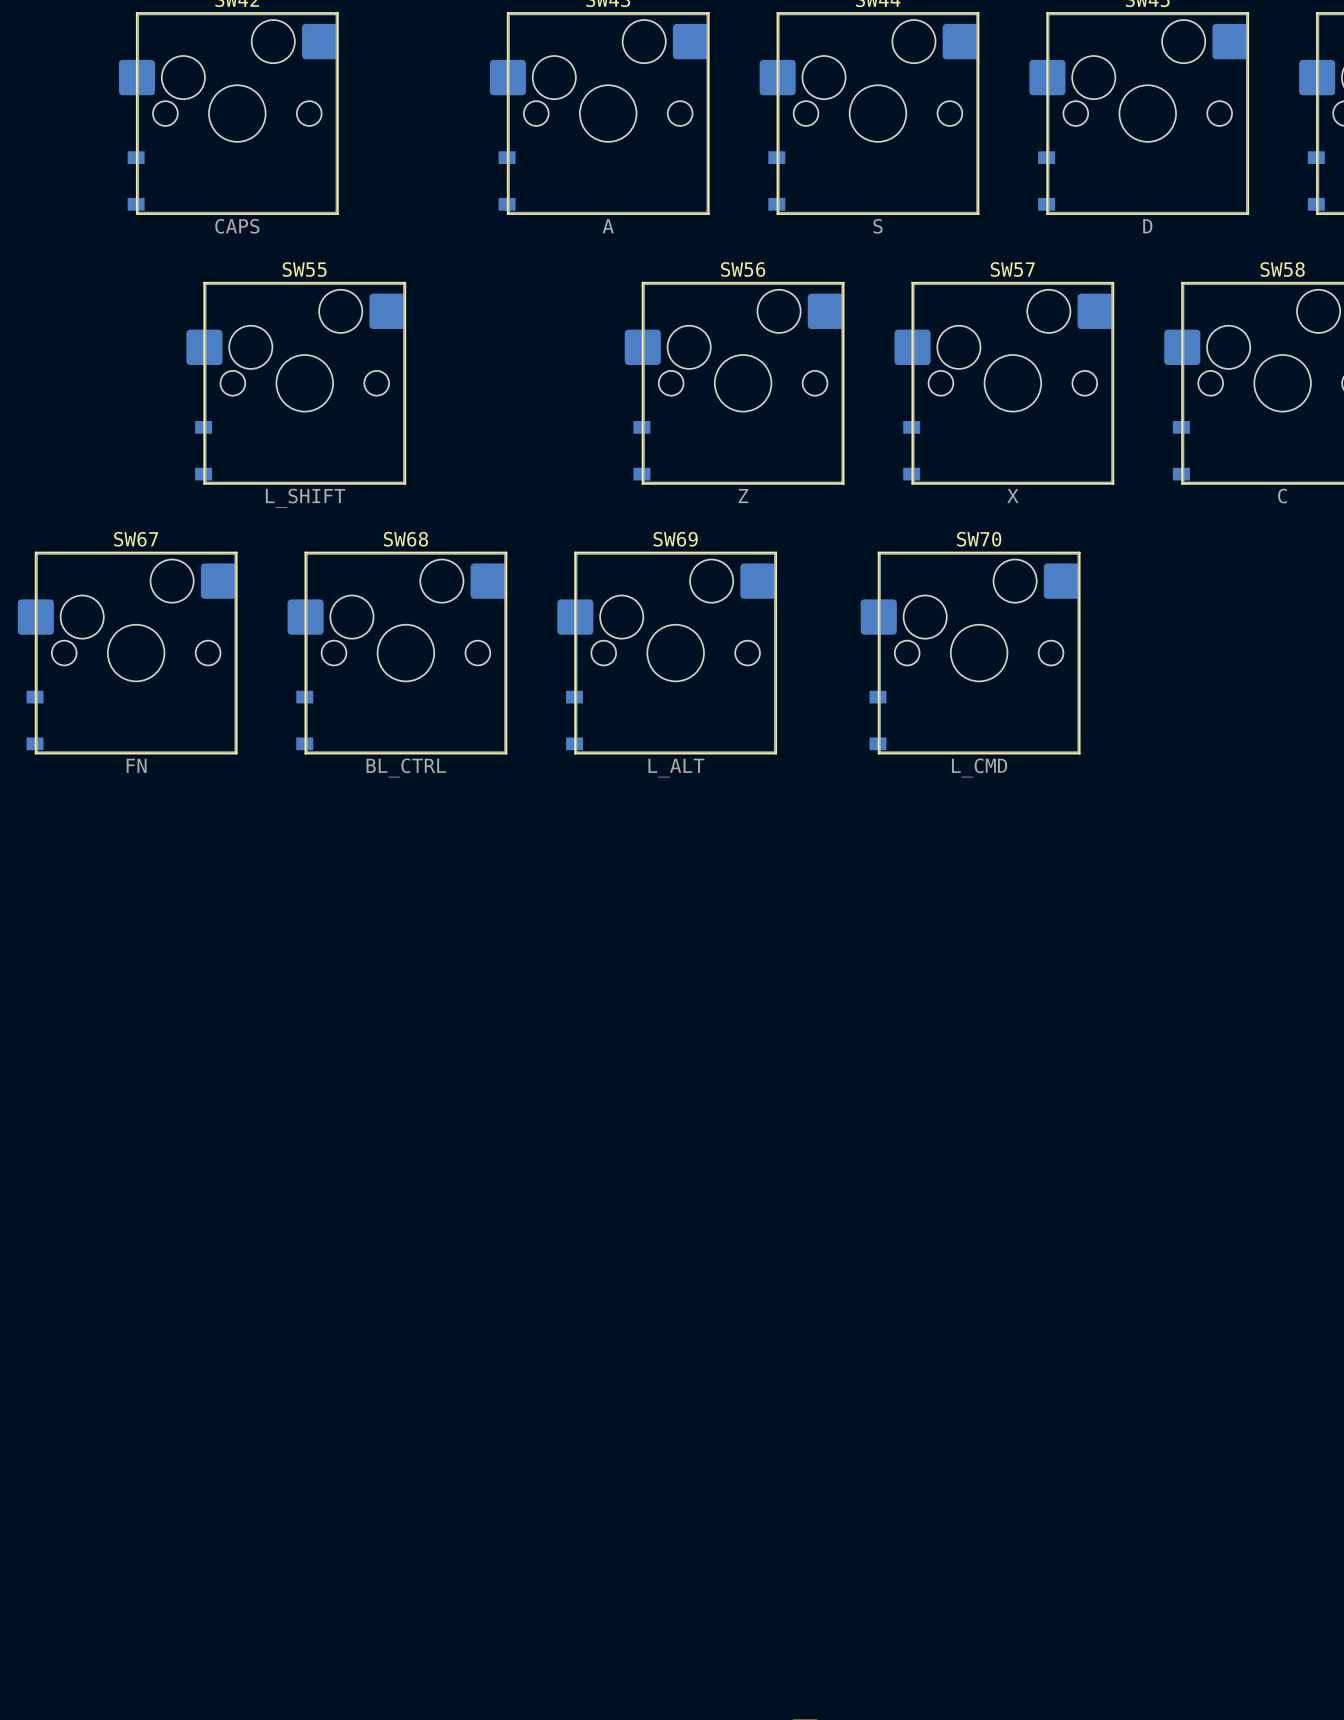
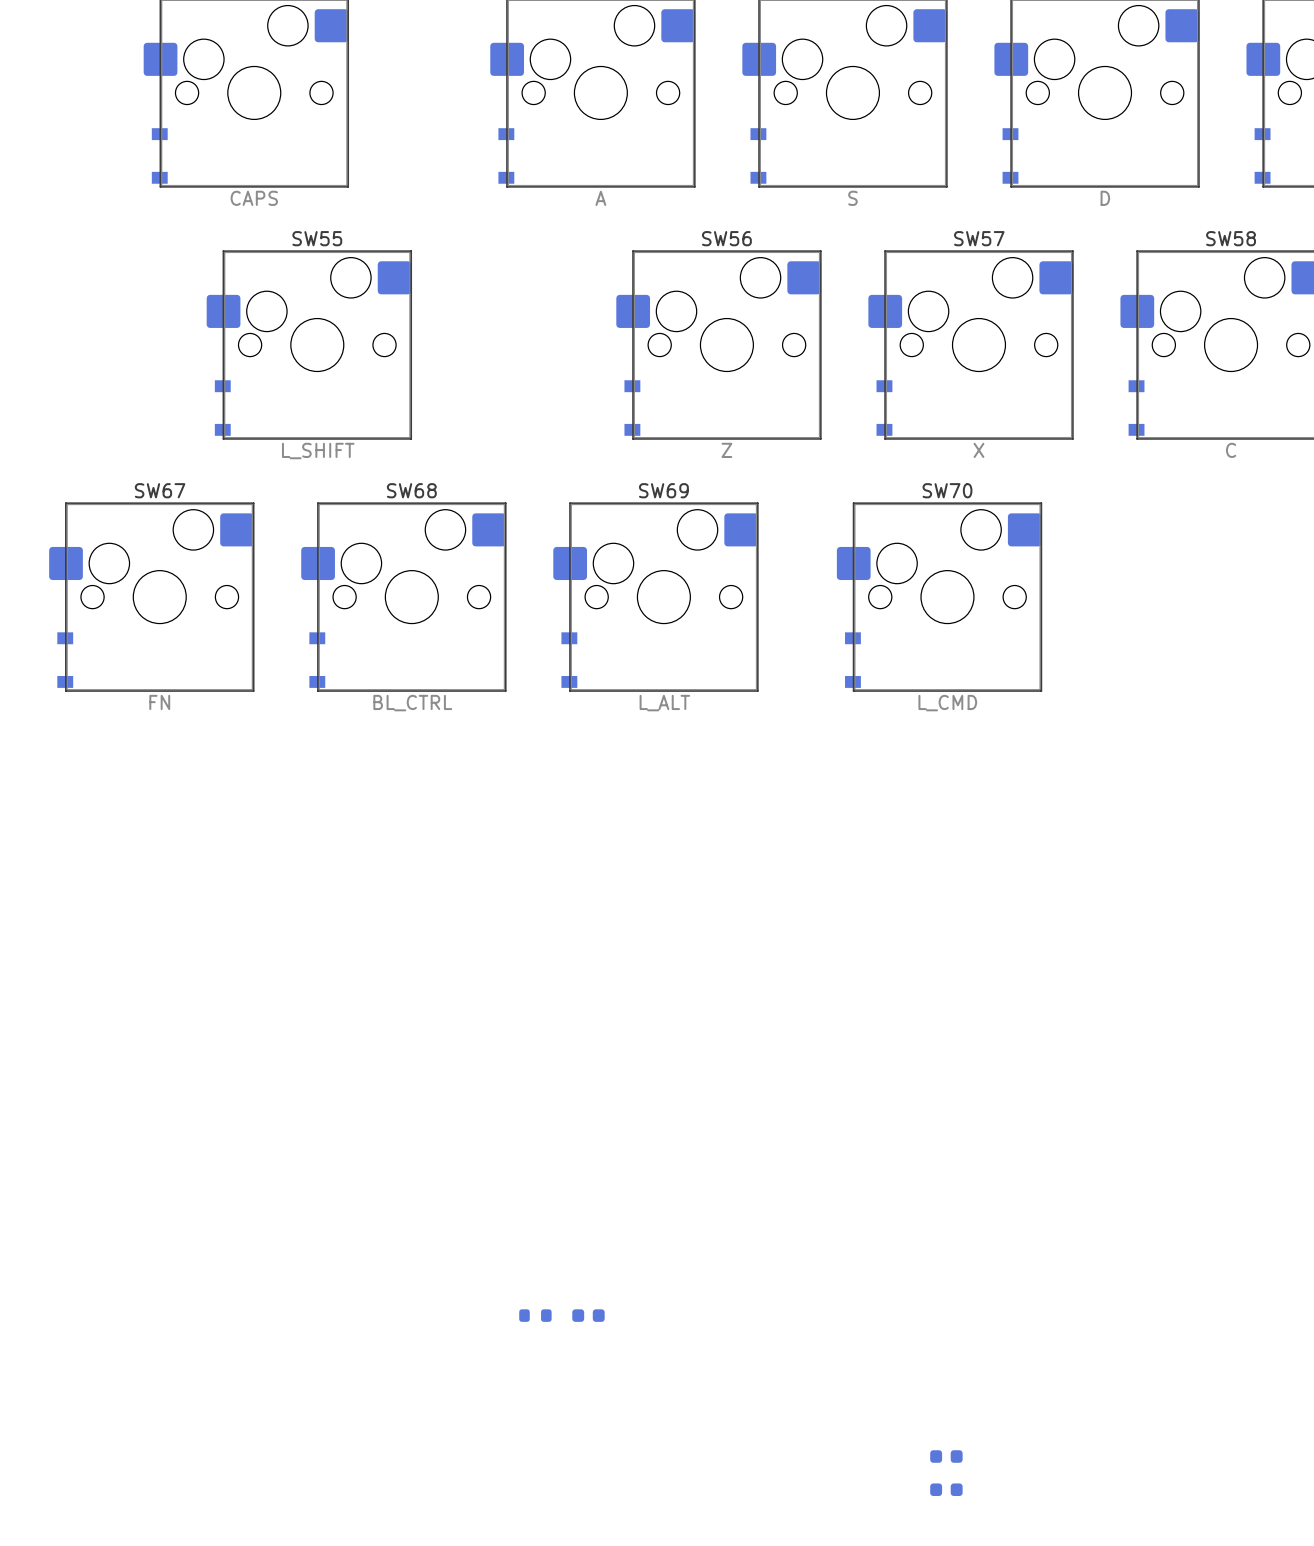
part: none -> (535, 1315)
part: none -> (588, 1315)
part: none -> (946, 1456)
part: none -> (946, 1489)

